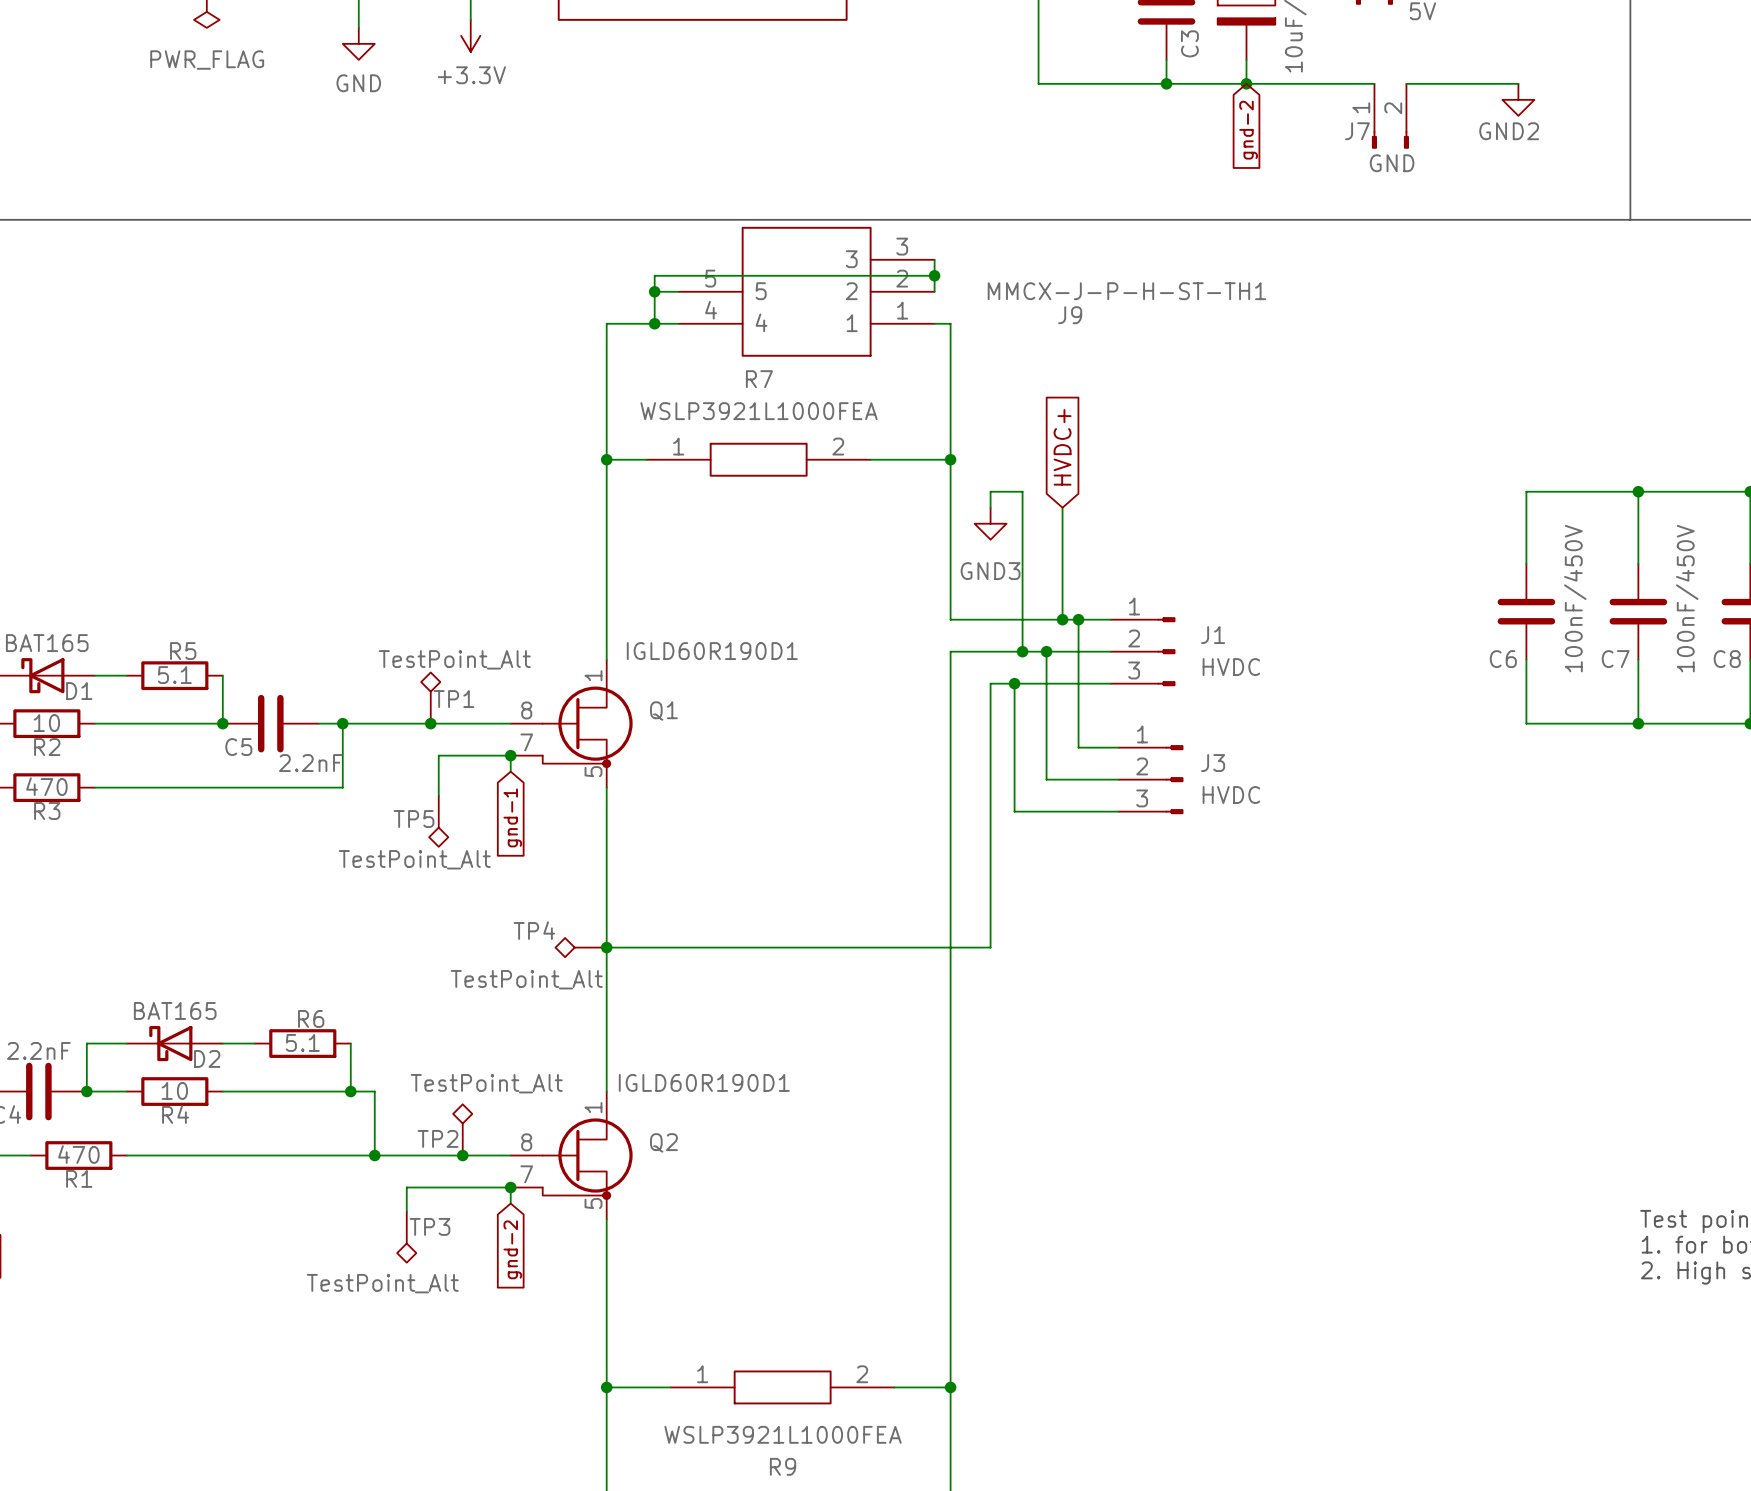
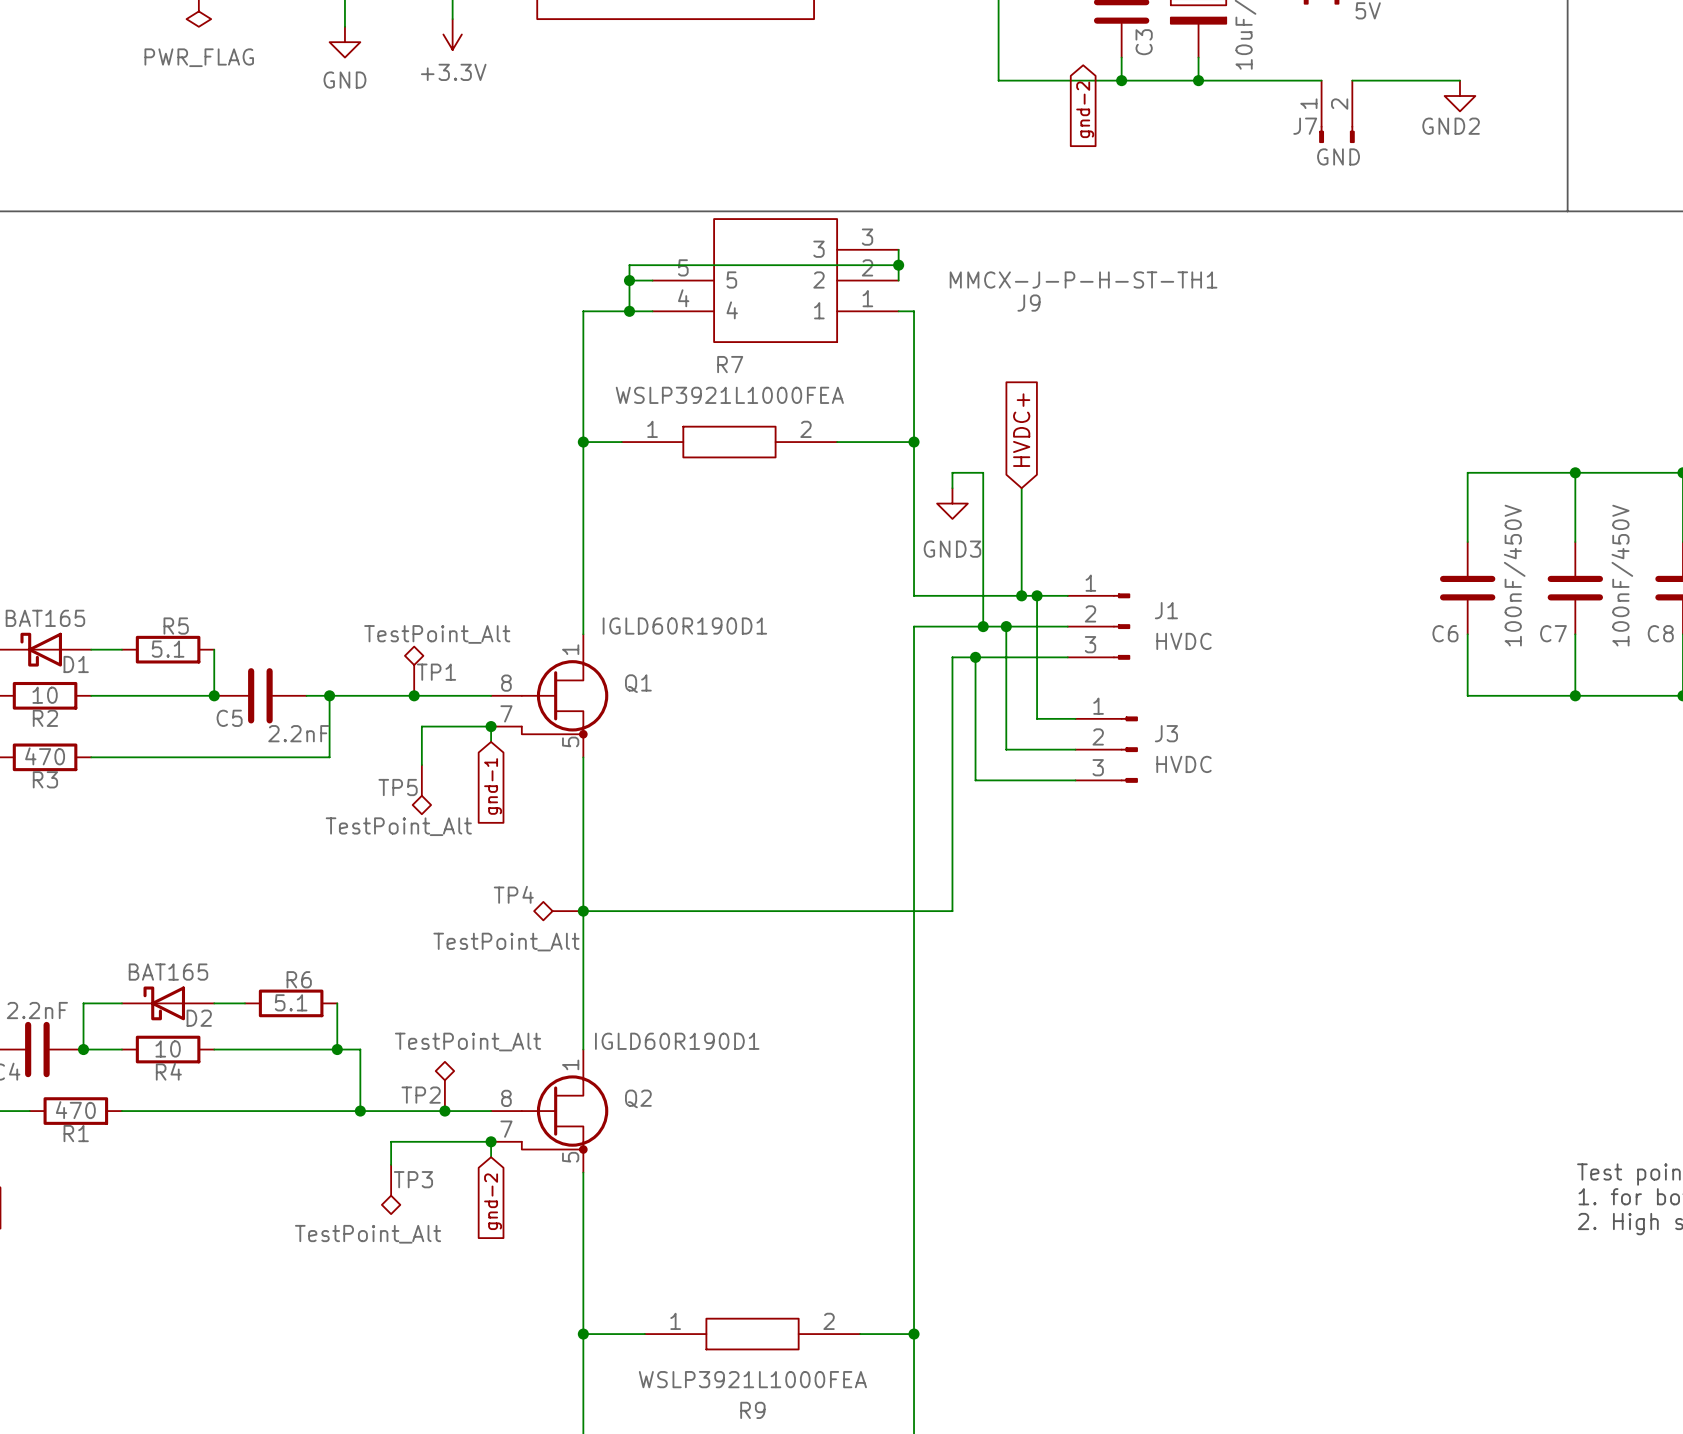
global label position: gnd-2 (1248, 130) -> gnd-2 (1085, 109)

